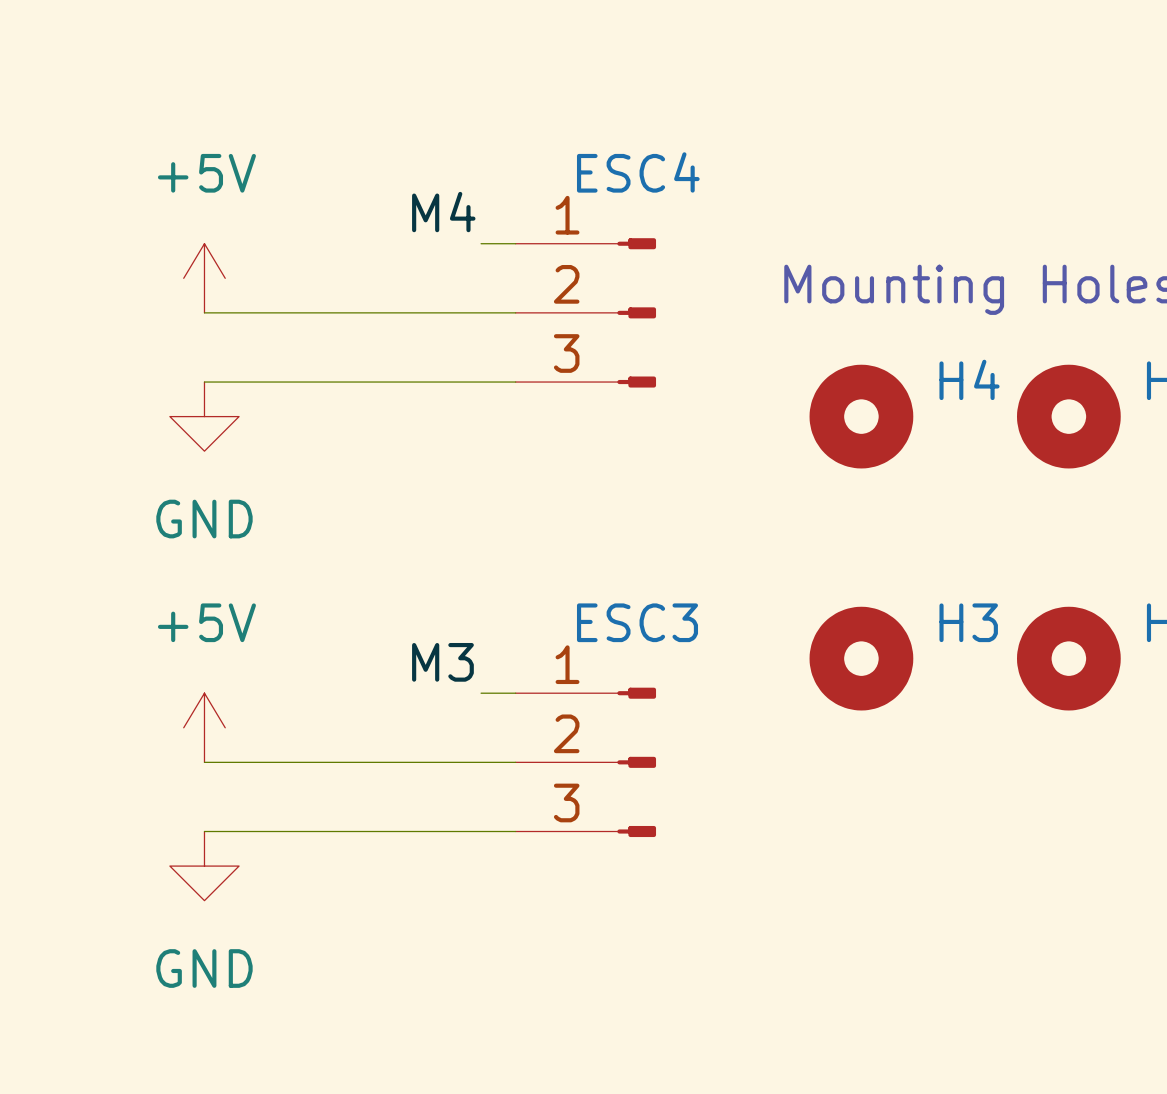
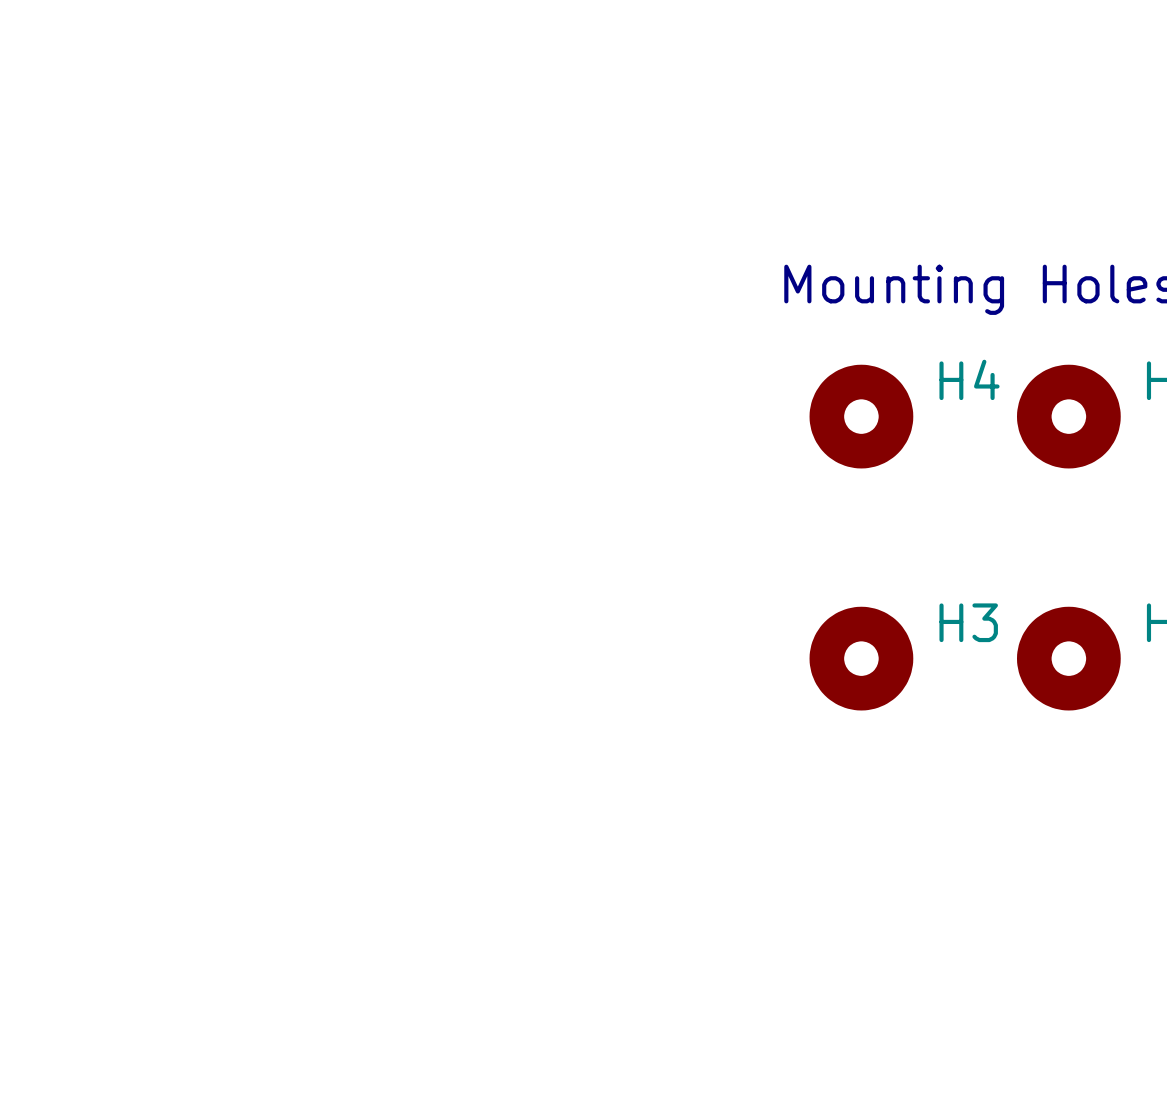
label: M4 (443, 212) -> none
wire: (481, 243) (515, 243) -> none
power symbol: +5V (204, 278) -> none
wire: (204, 312) (515, 312) -> none
ESC4: (585, 312) -> none
wire: (204, 382) (515, 382) -> none
power symbol: GND (204, 416) -> none
label: M3 (442, 662) -> none
wire: (481, 693) (515, 693) -> none
power symbol: +5V (204, 727) -> none
wire: (204, 762) (515, 762) -> none
ESC3: (585, 762) -> none
wire: (204, 831) (515, 831) -> none
power symbol: GND (204, 866) -> none

